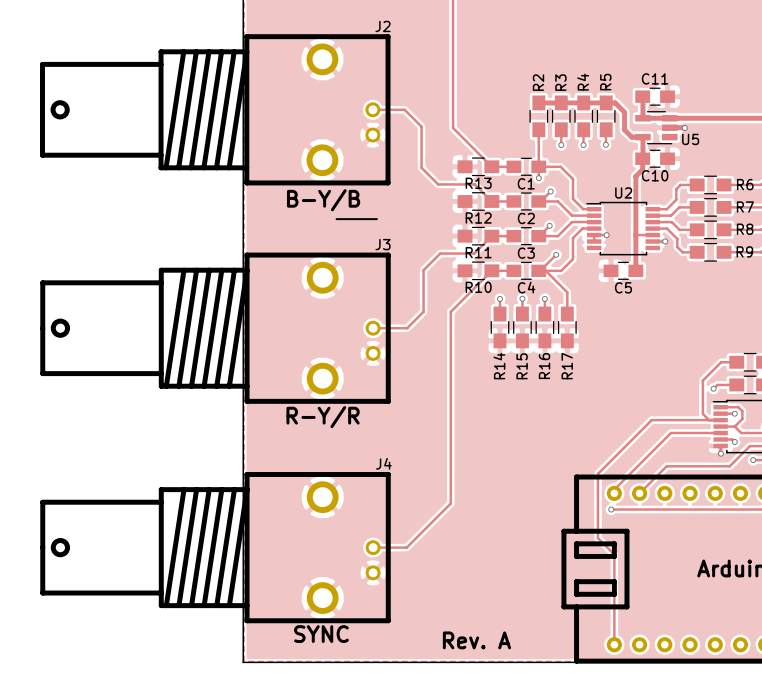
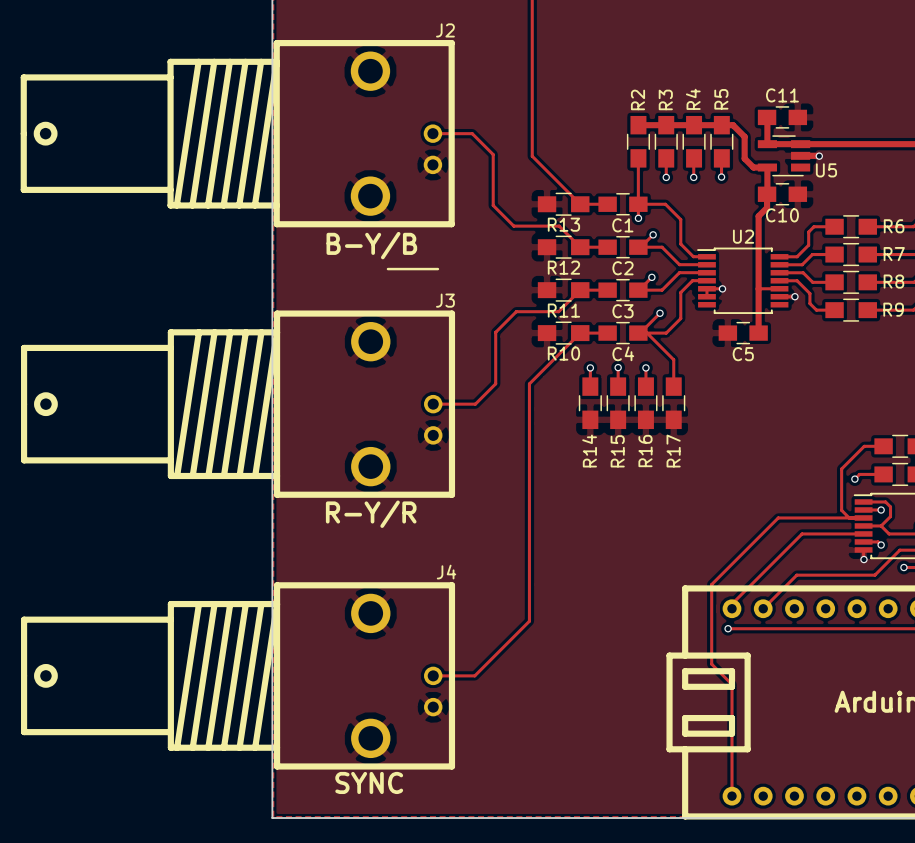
text: Rev. A (476, 640) -> none

